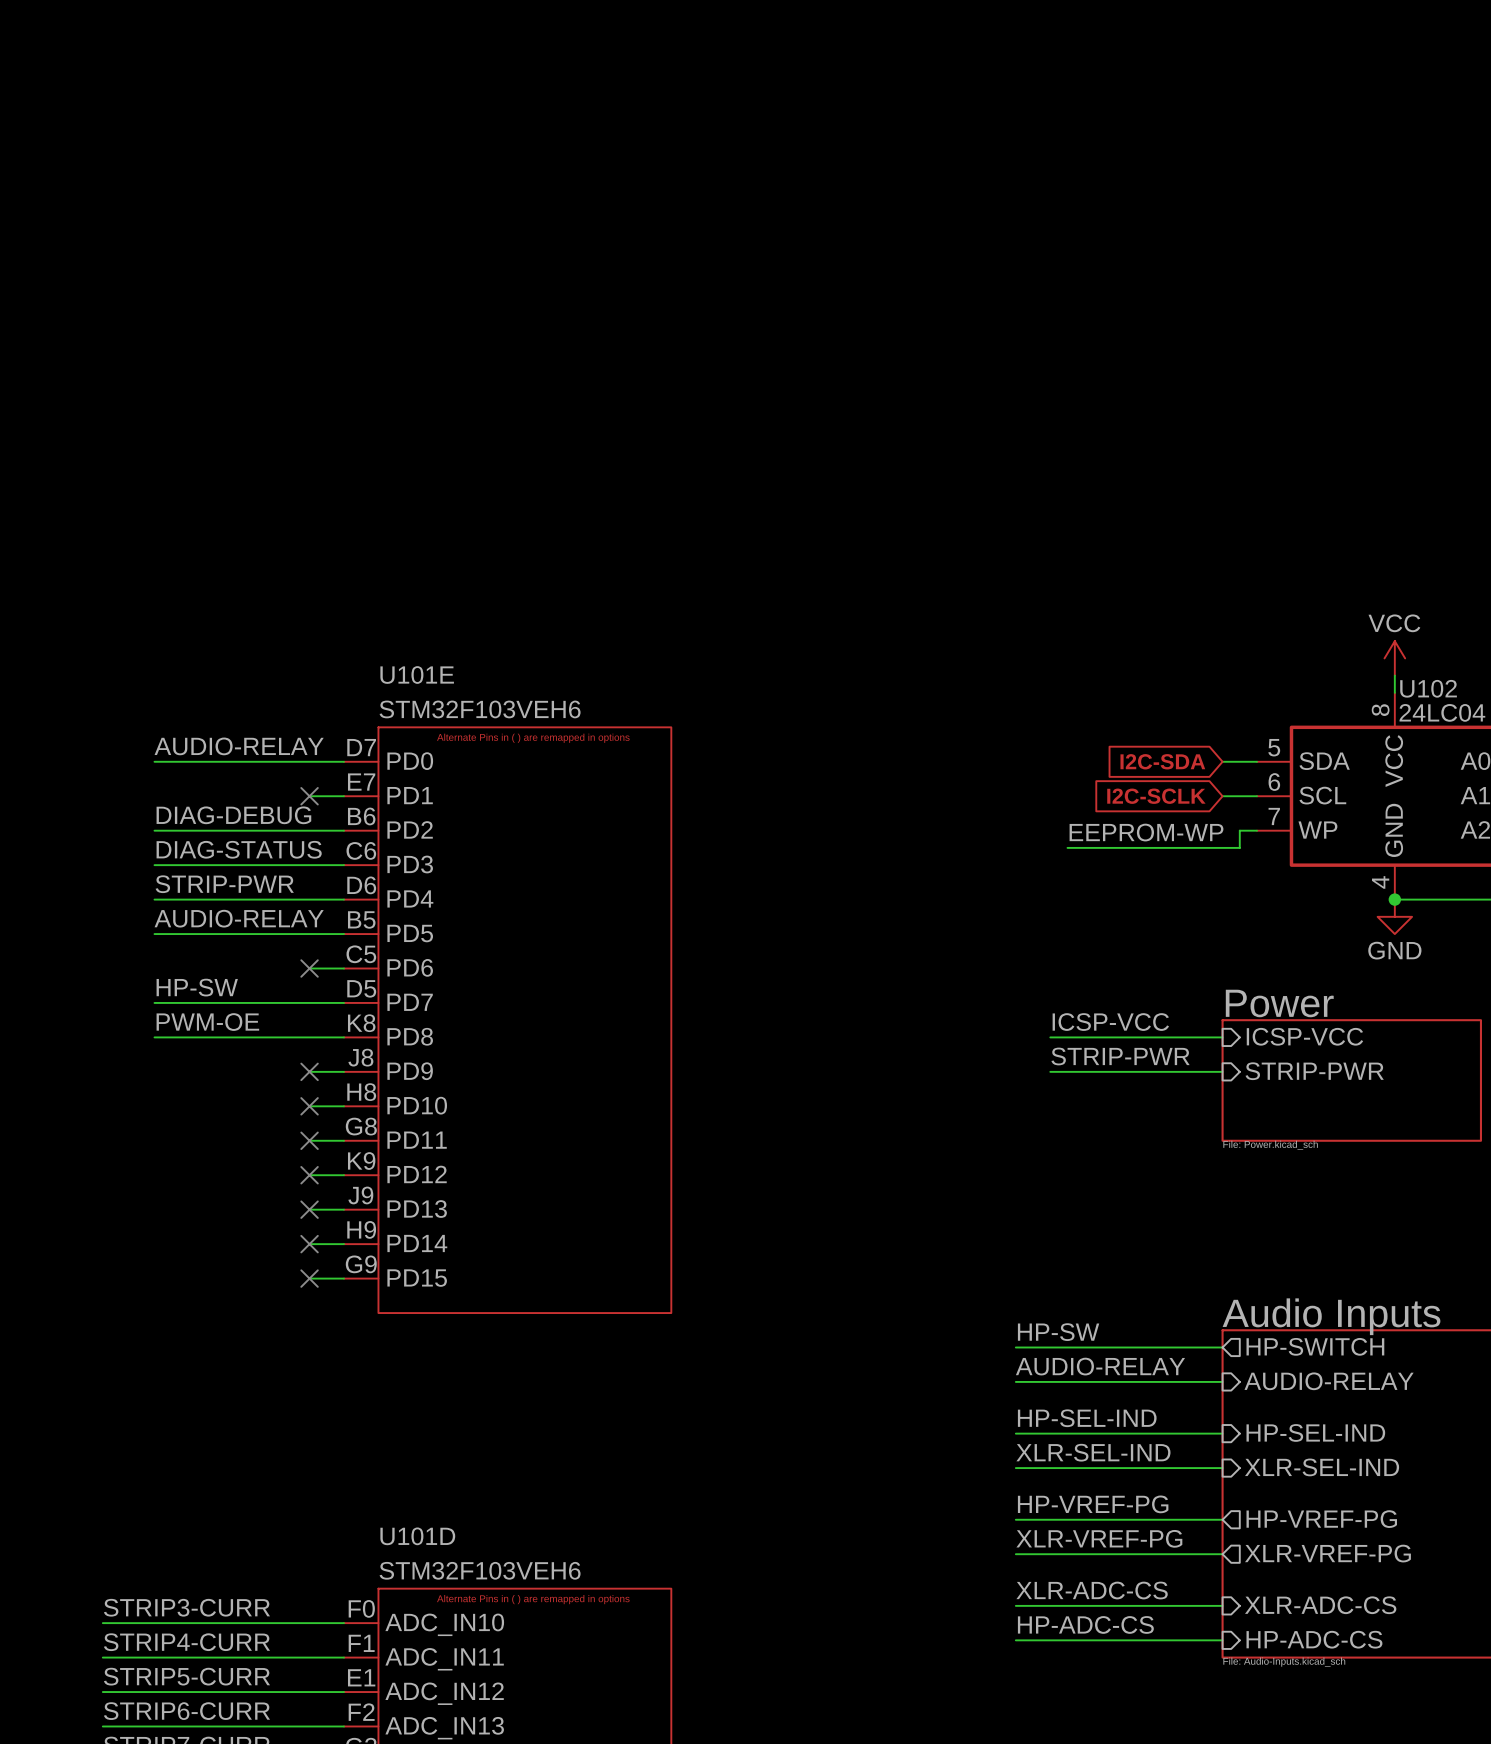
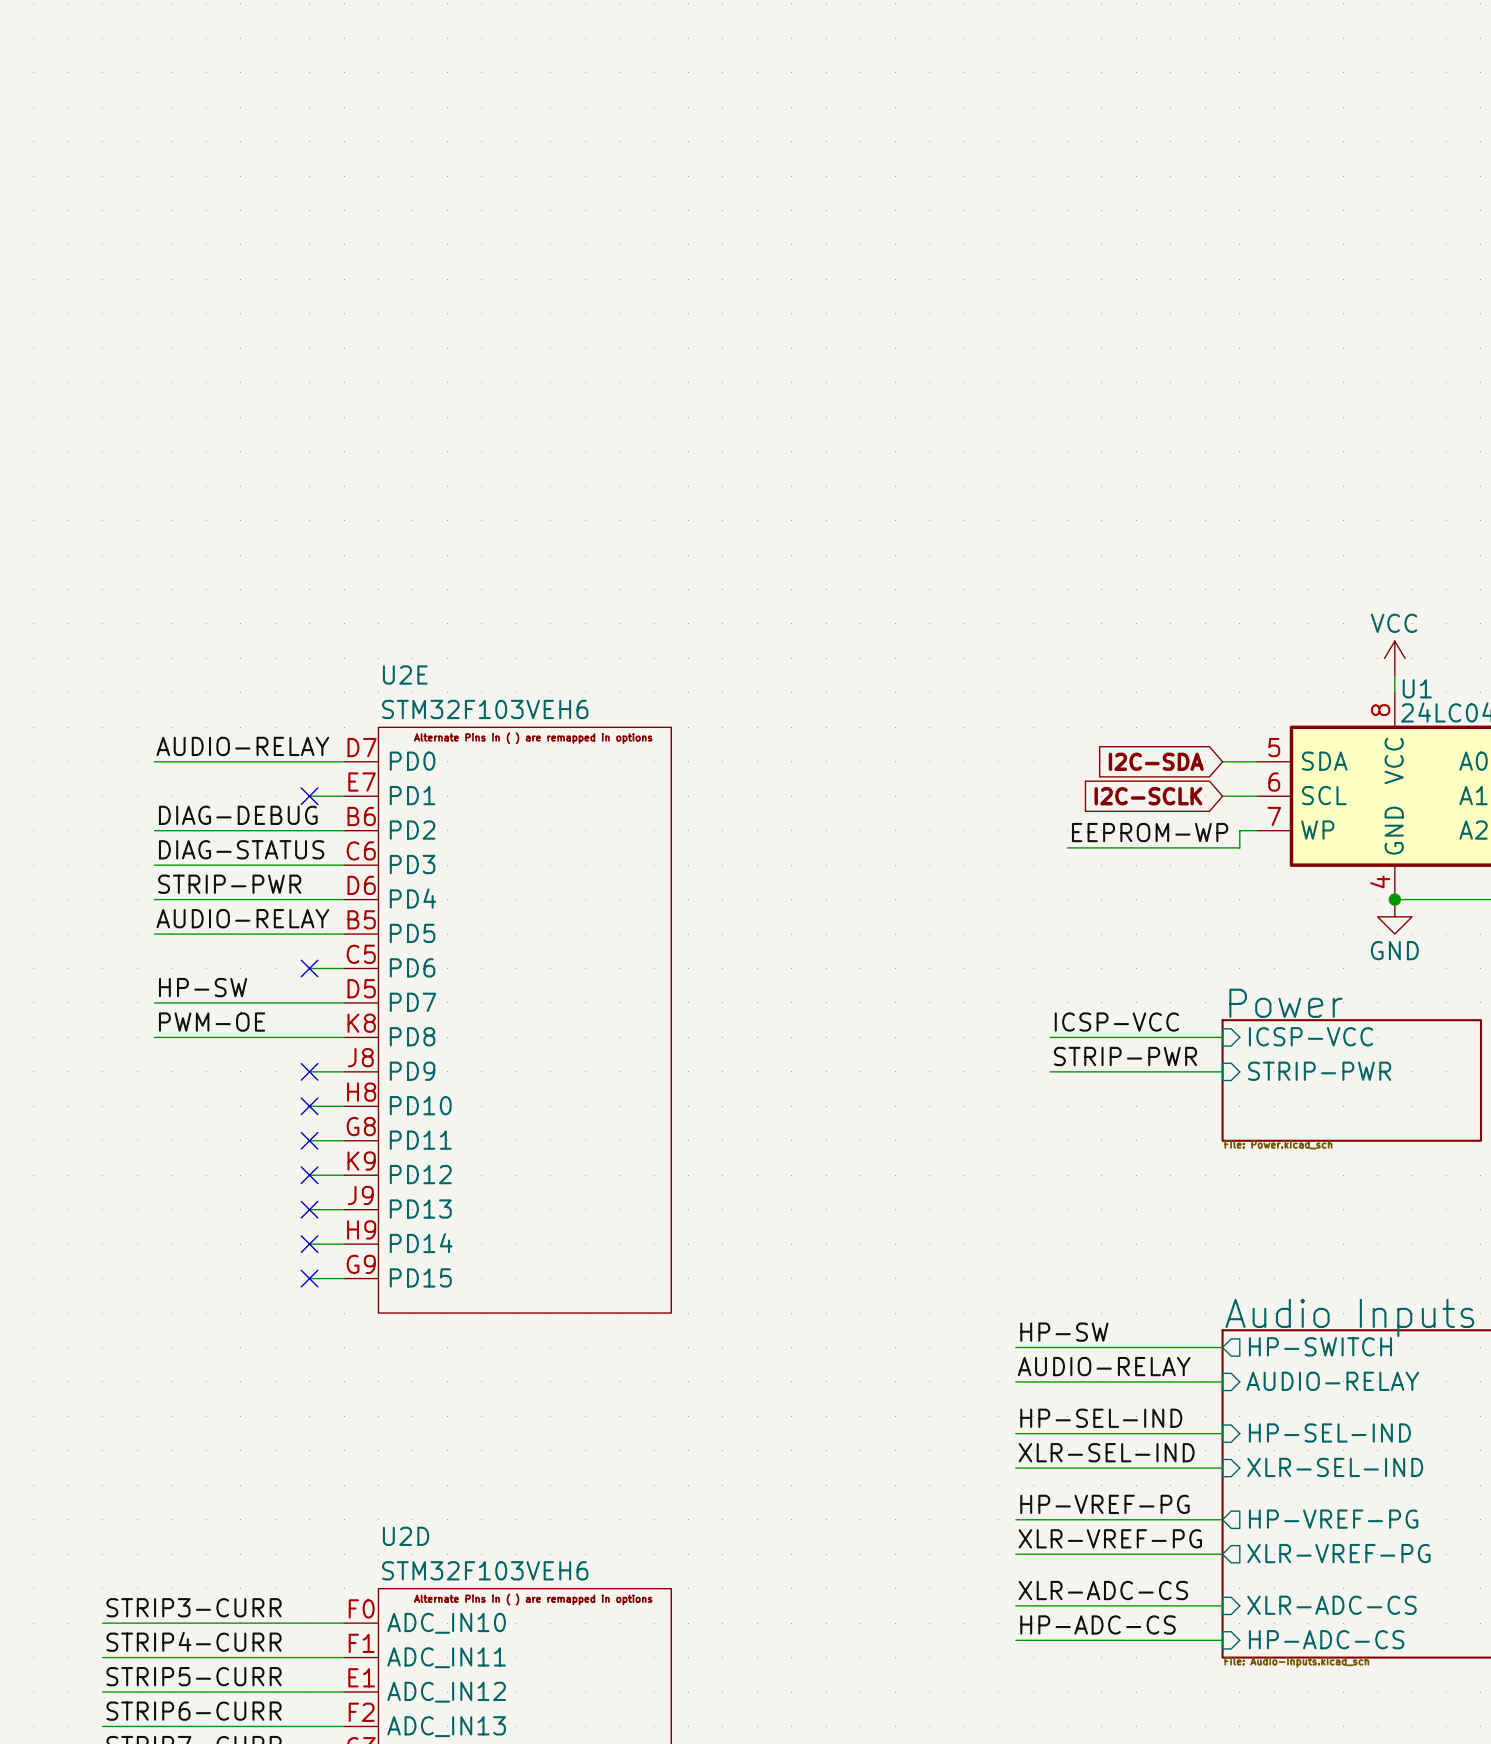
U101E name: U101E (417, 675) -> U2E (405, 675)
U102 name: U102 (1428, 688) -> U1 (1417, 688)
U101D name: U101D (417, 1536) -> U2D (406, 1536)

